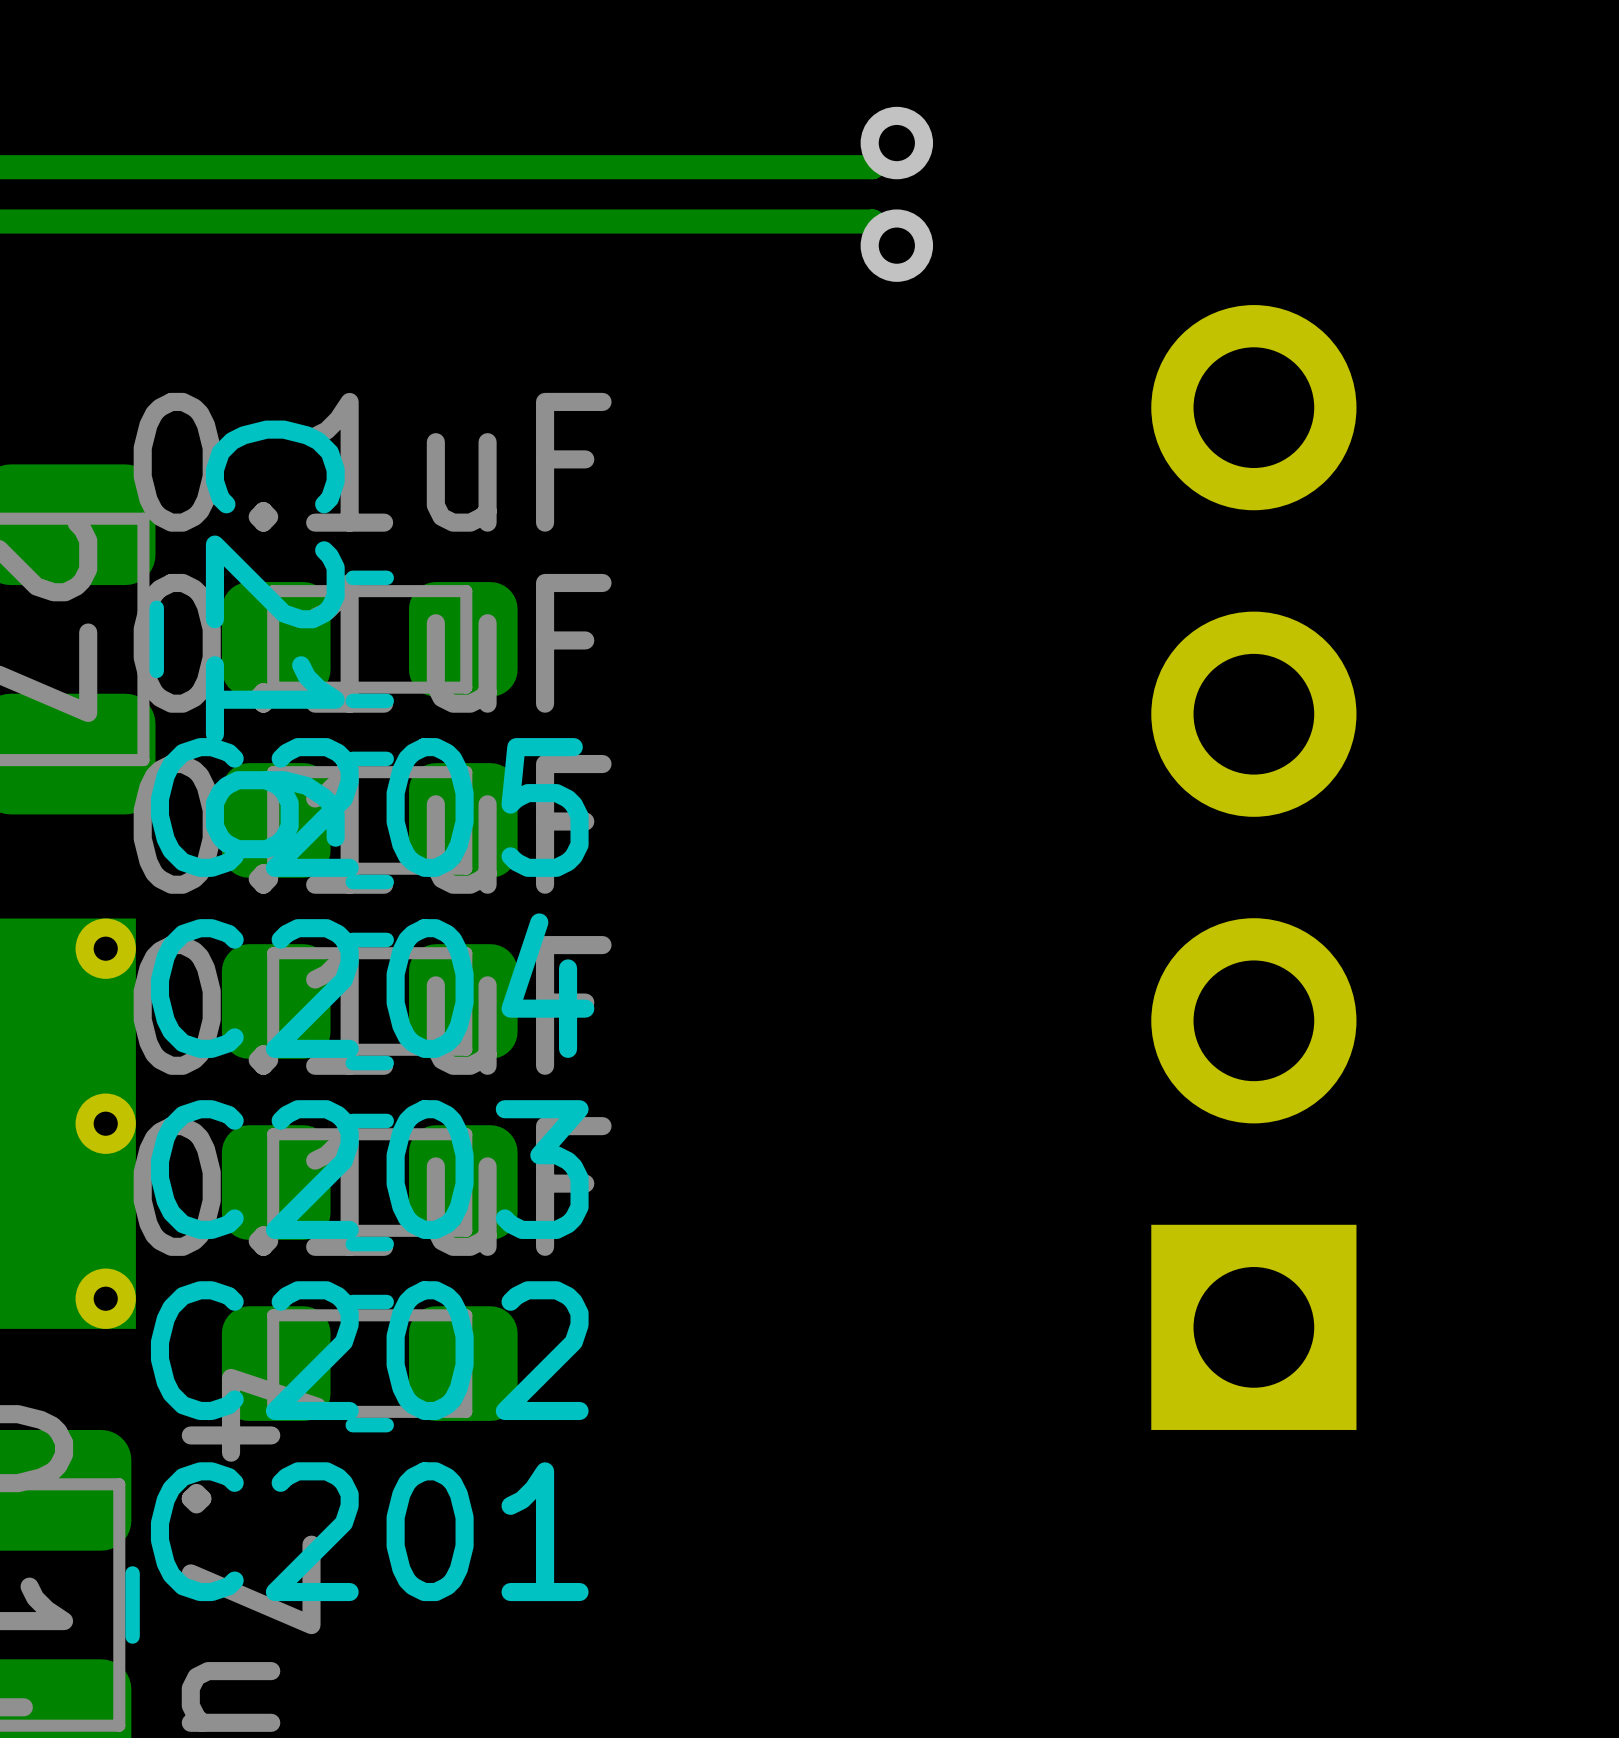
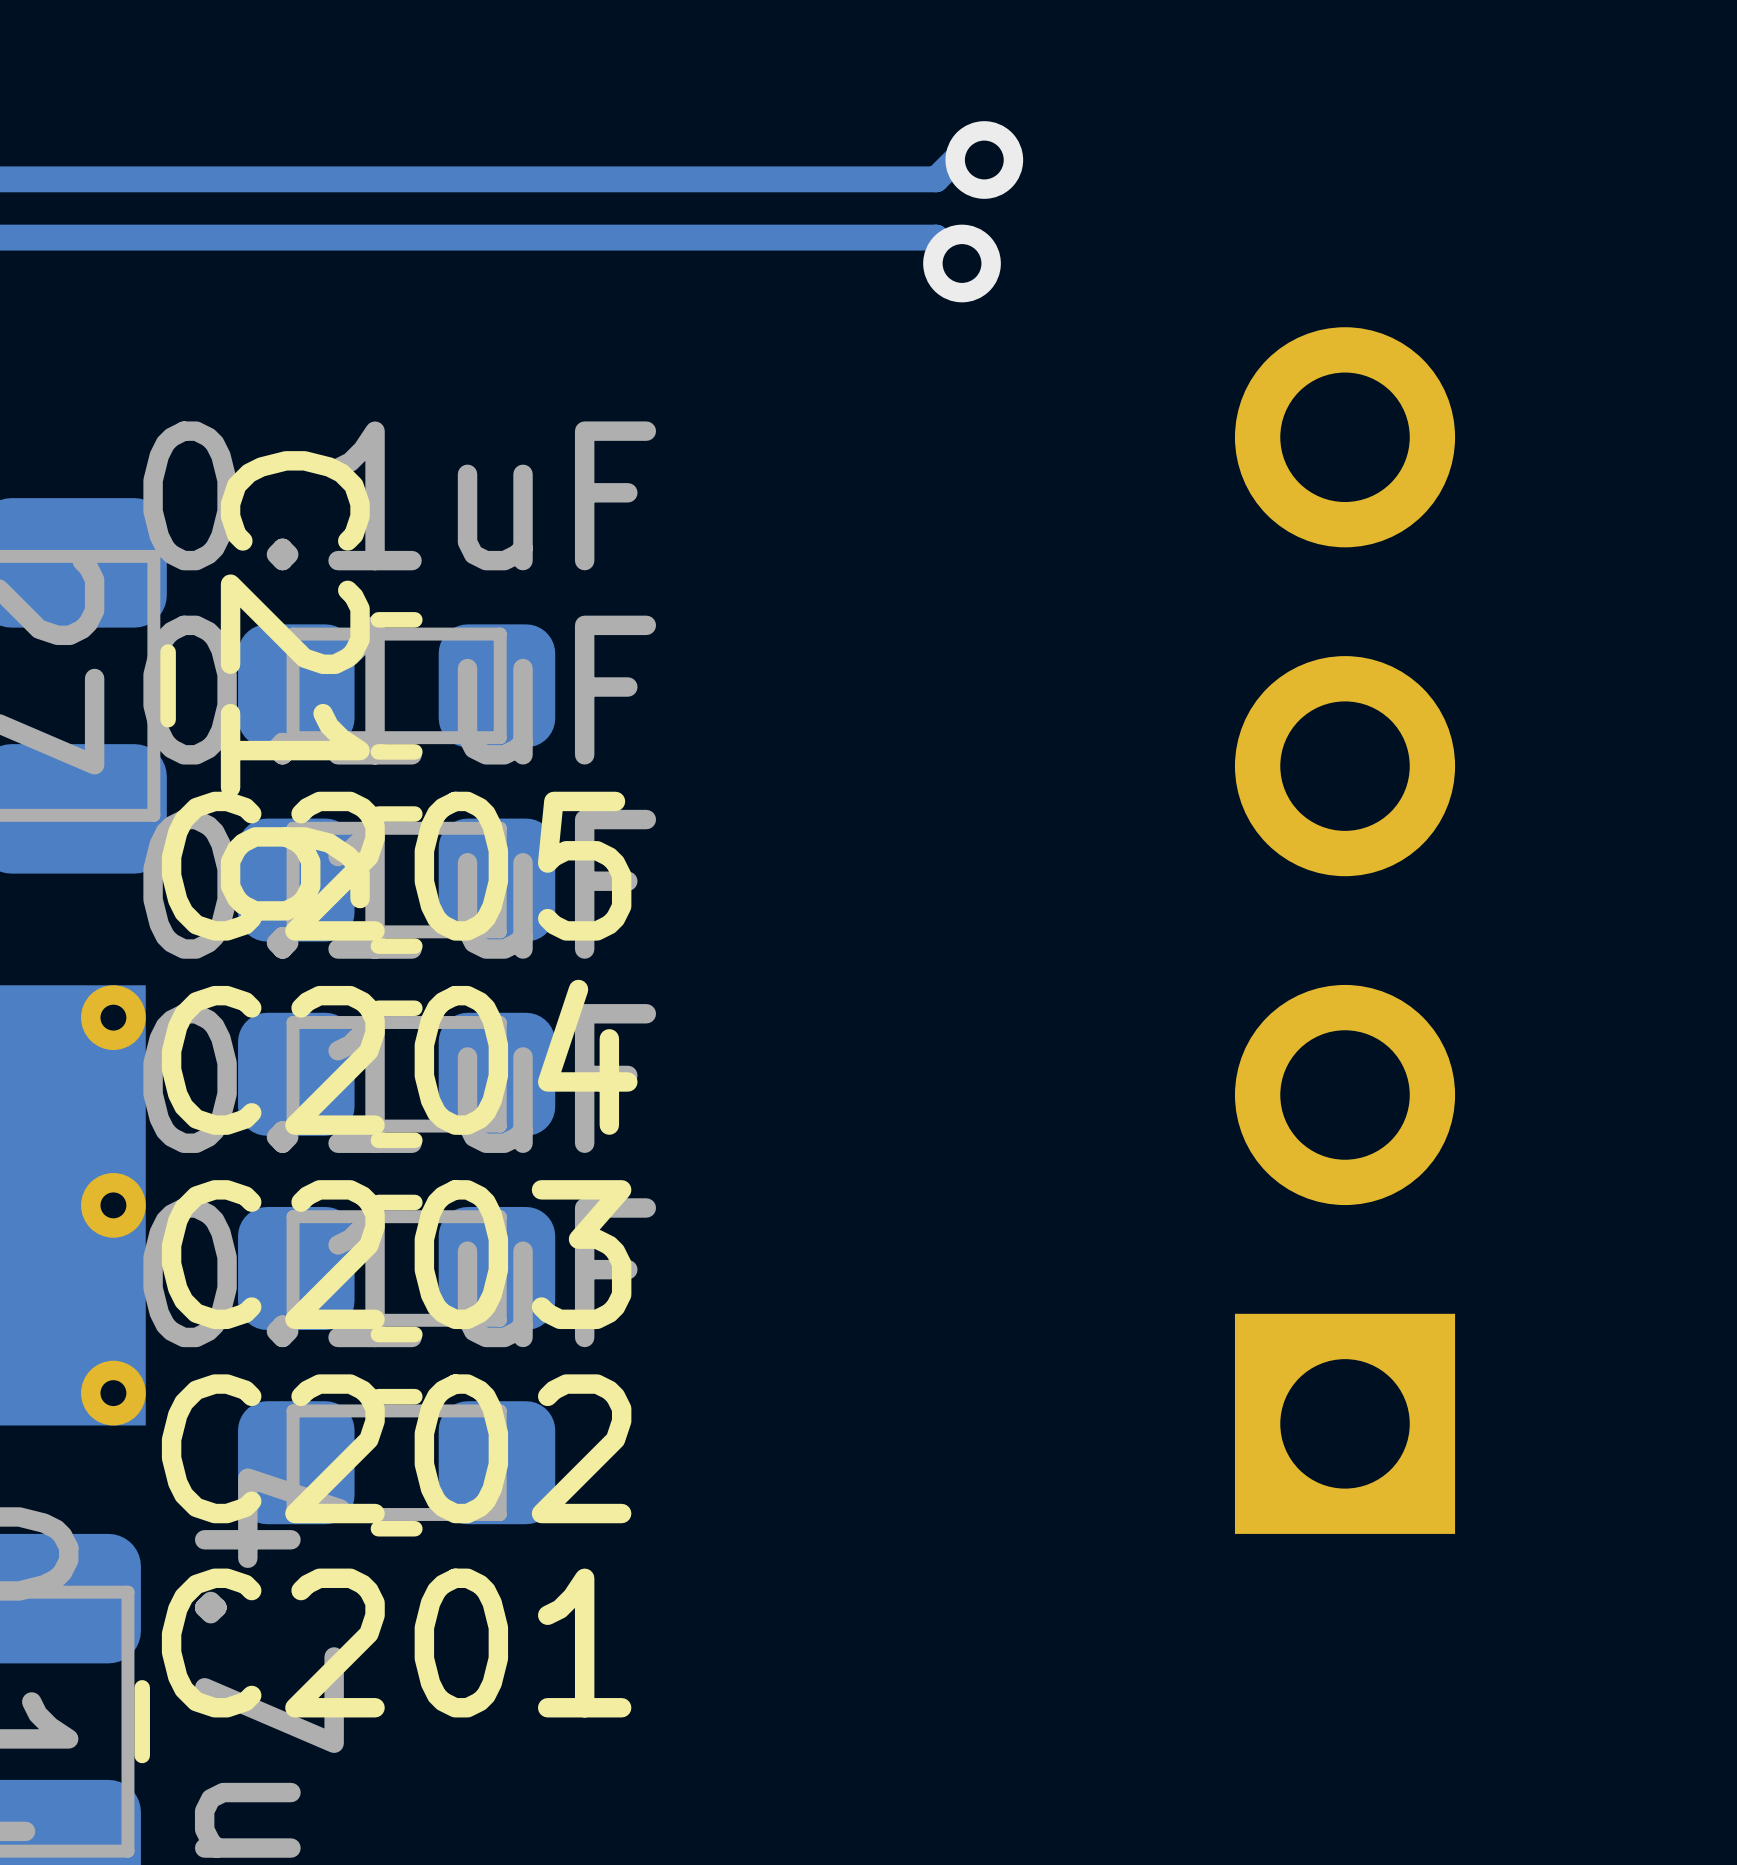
via position: (896, 143) -> (984, 160)

